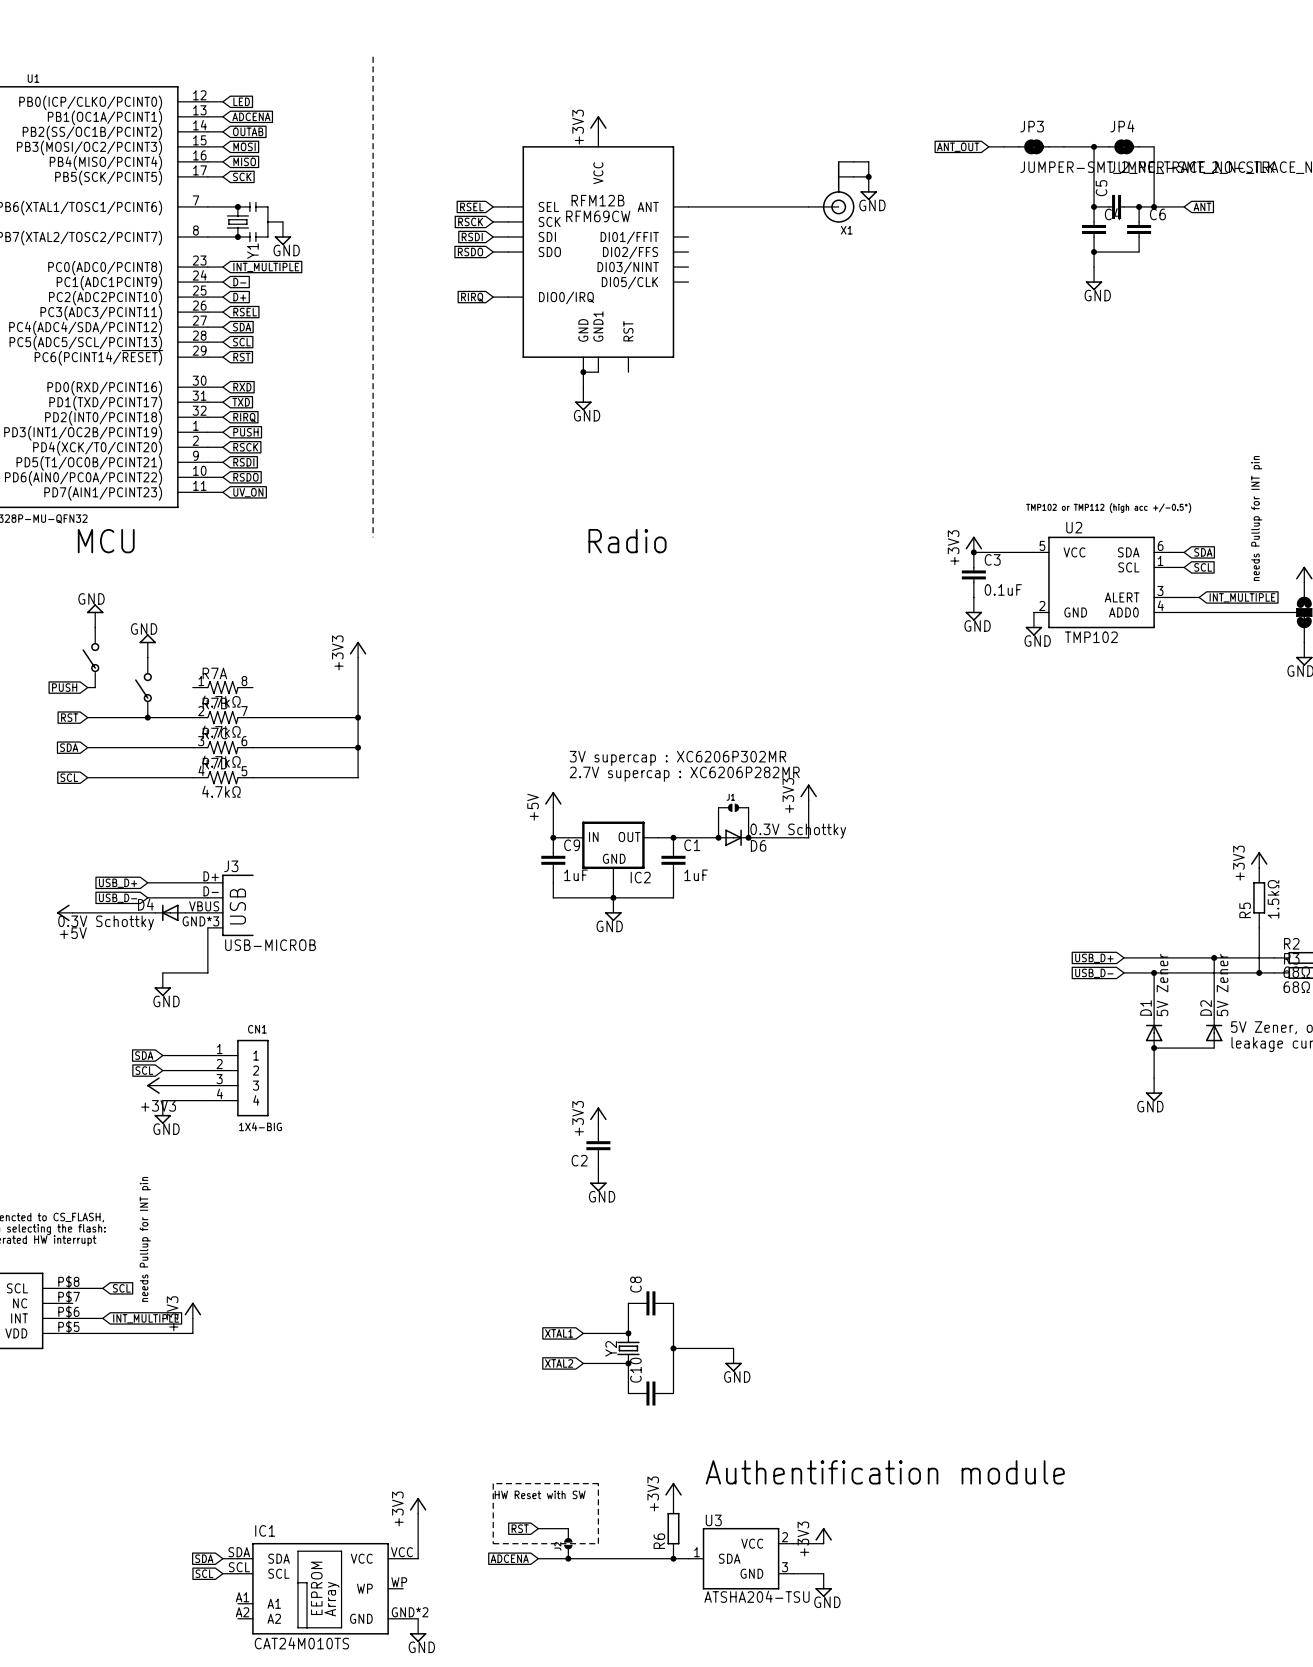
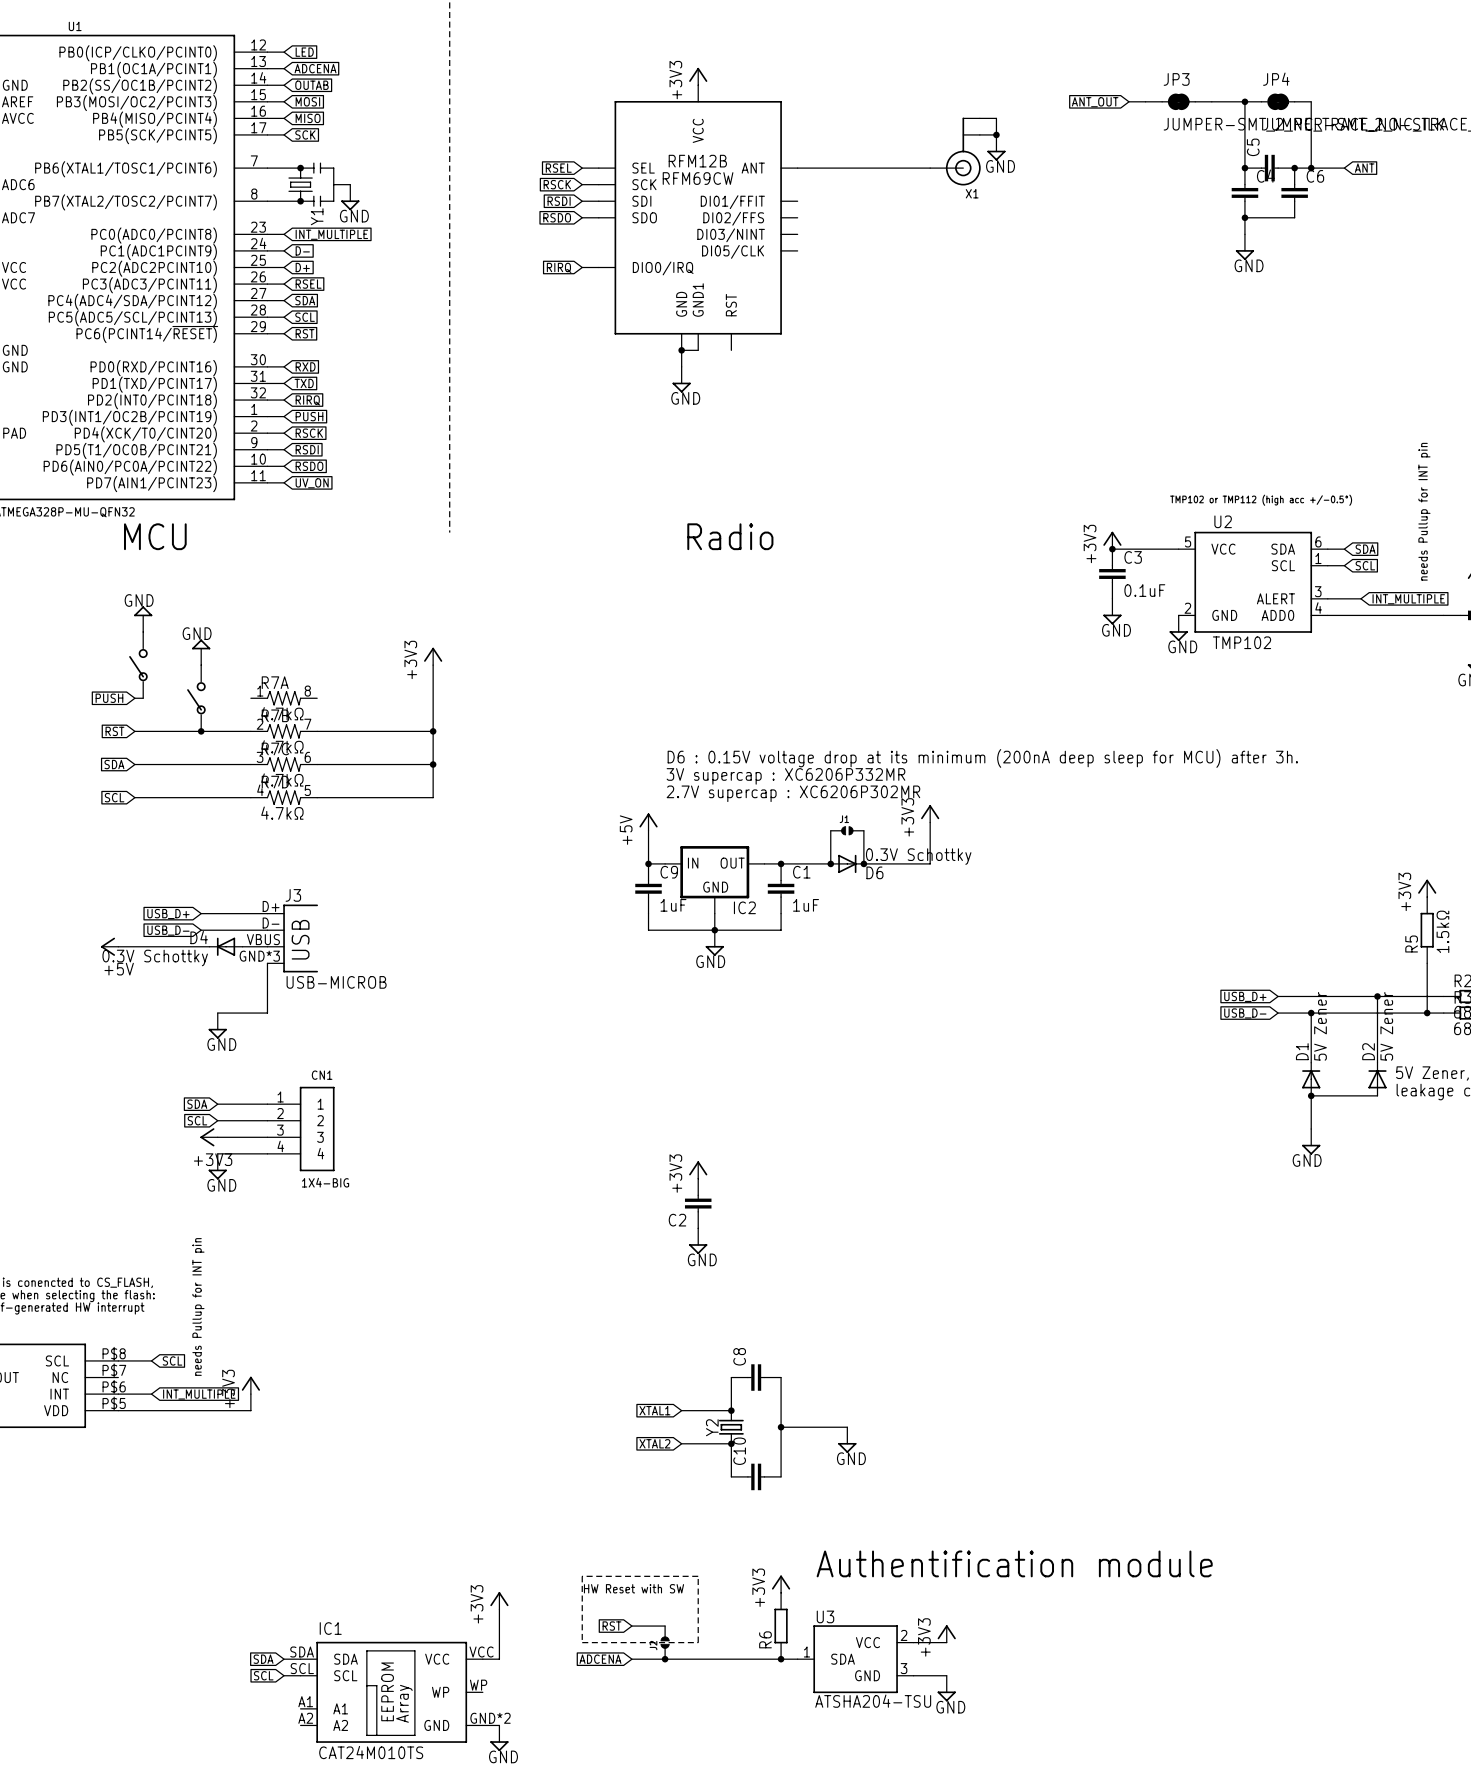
text: none -> D6 : 0.15V voltage drop at its minimum (200nA deep sleep for MCU) after 3h. (982, 758)
text: 3V supercap : XC6206P302MR (677, 758) -> 3V supercap : XC6206P332MR (785, 776)
text: 2.7V supercap : XC6206P282MR (684, 774) -> 2.7V supercap : XC6206P302MR (793, 793)

